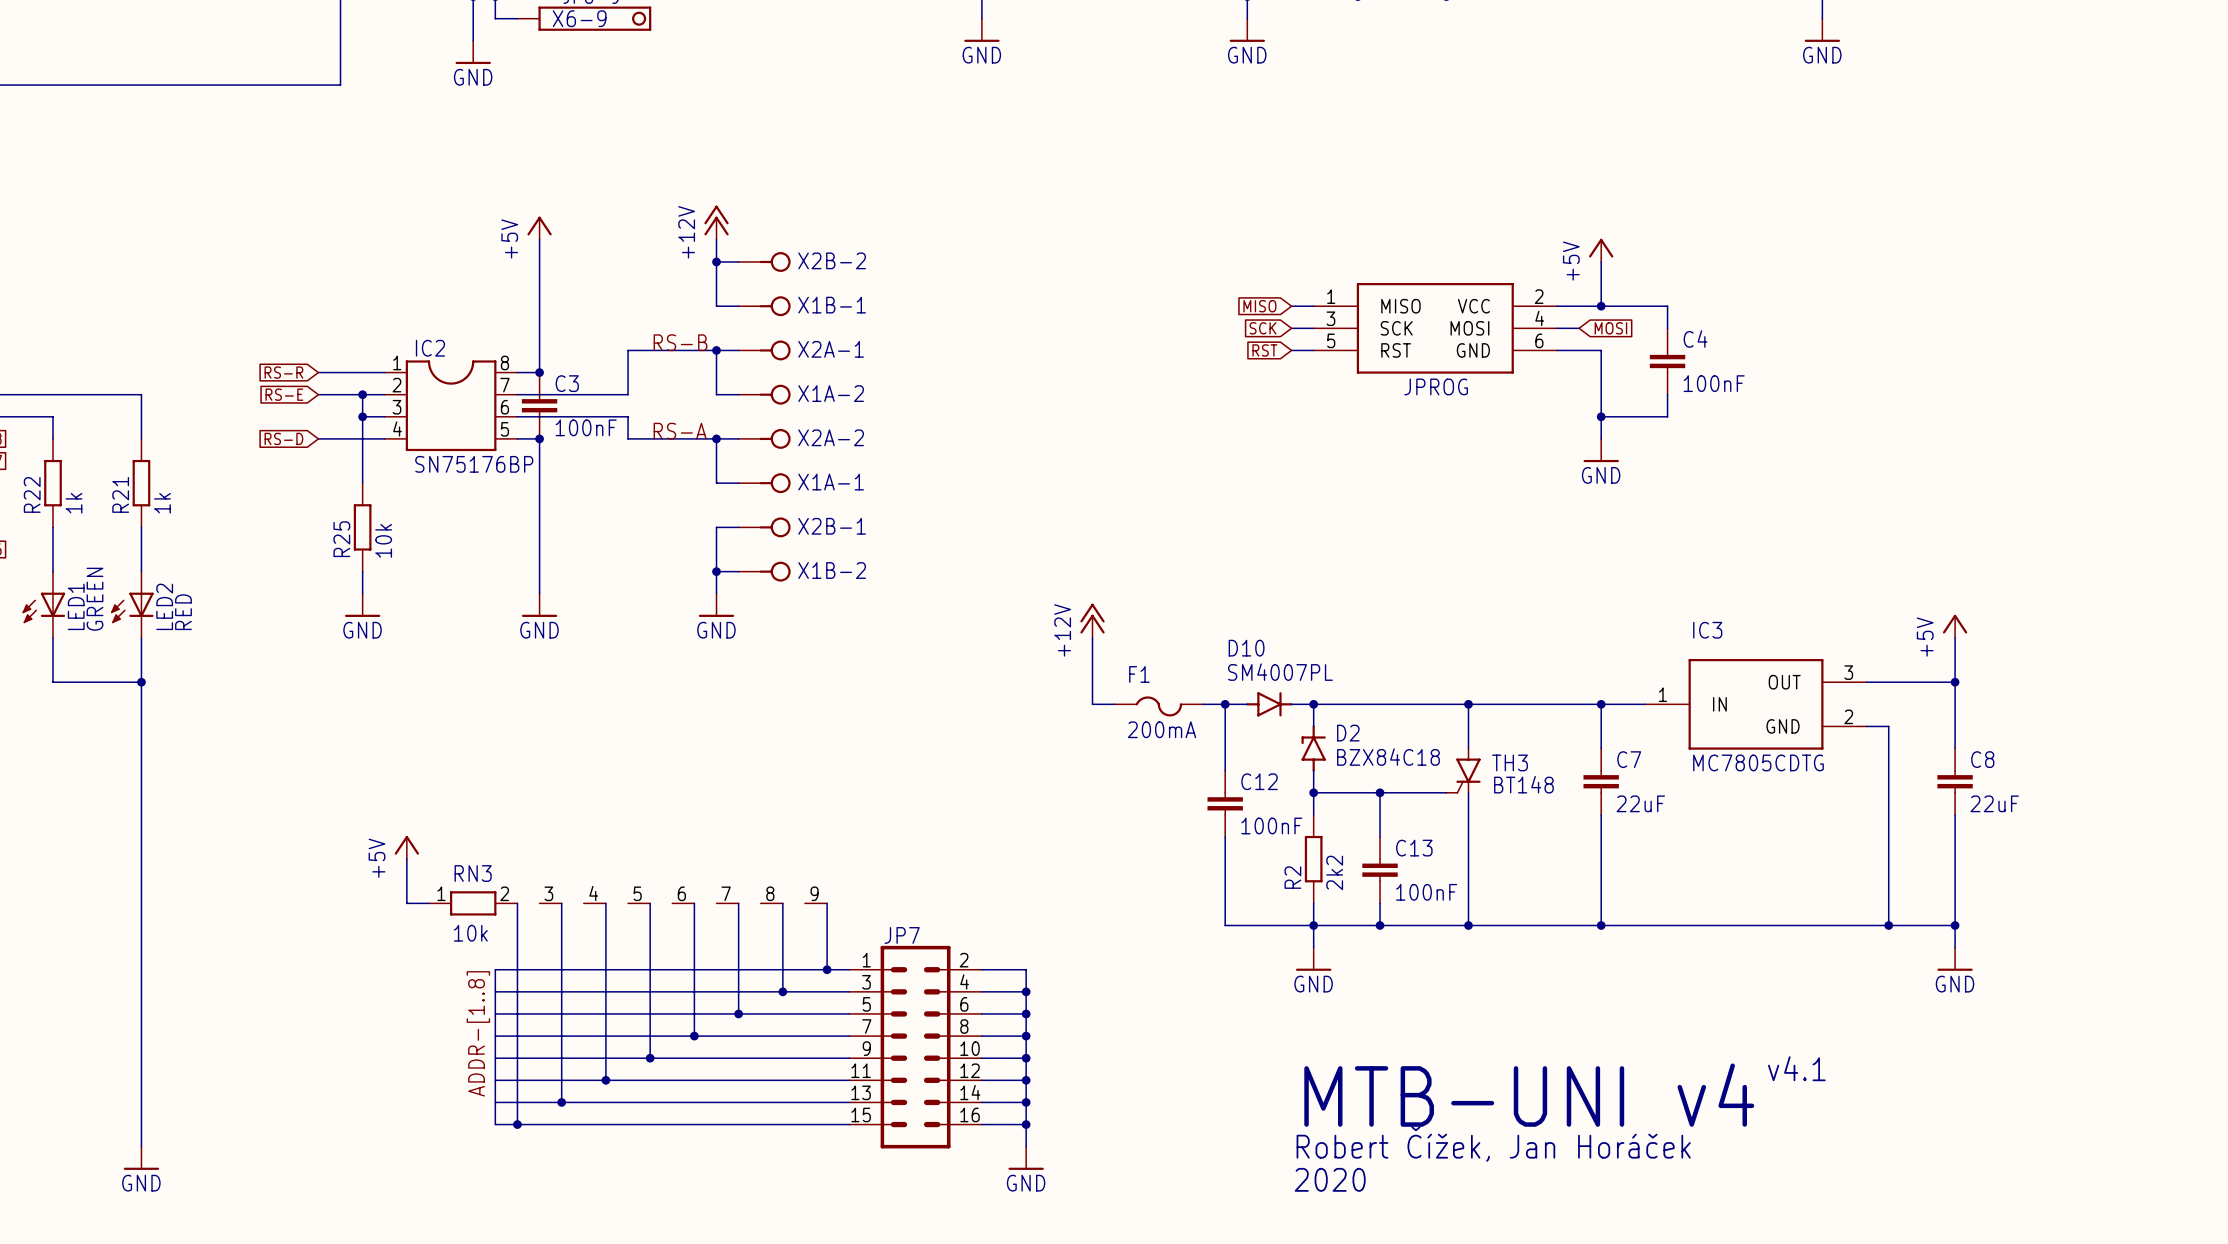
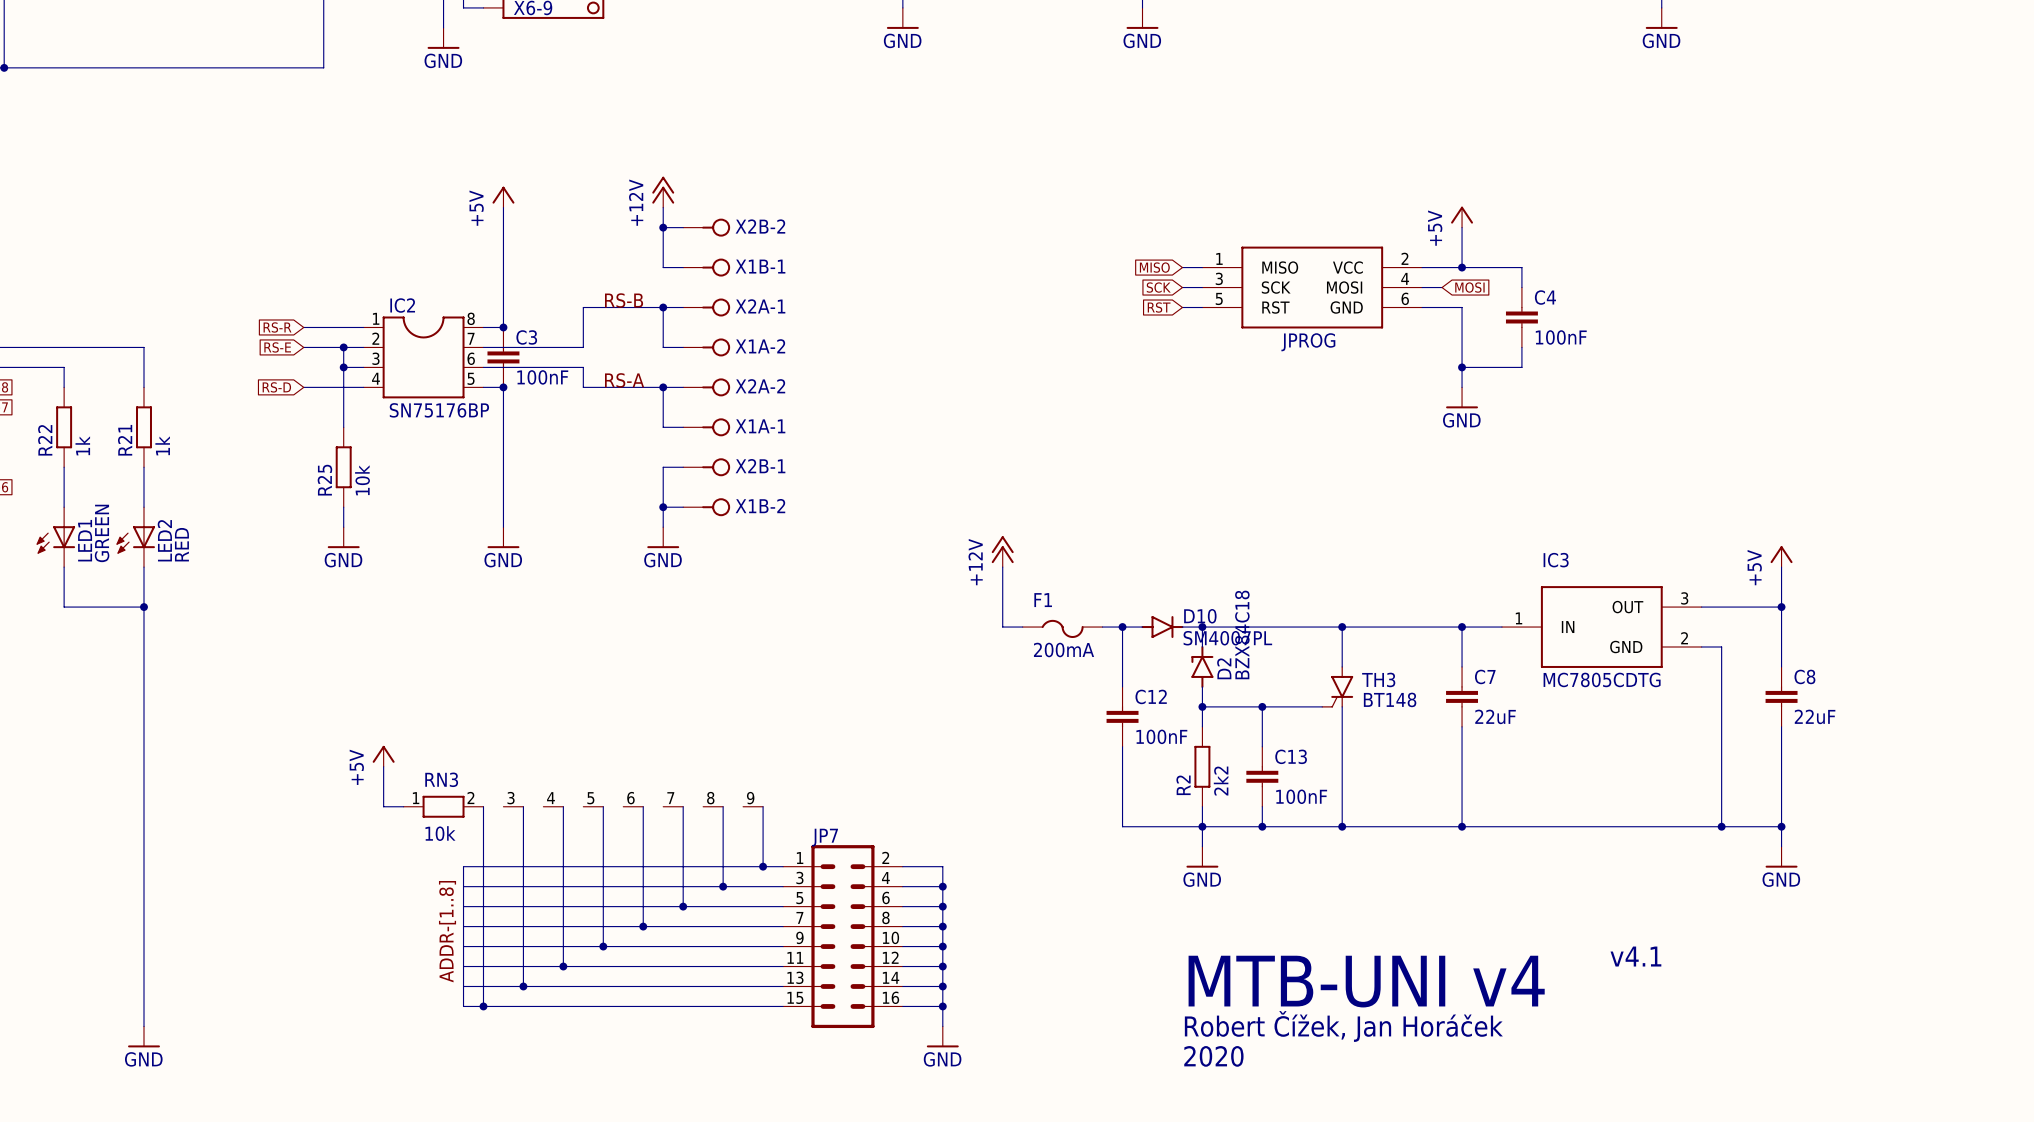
D10 name position: D10 (1246, 648) -> D10 (1200, 616)
D10 value position: SM4007PL (1280, 672) -> SM4007PL (1227, 638)
D2 name rotation: 0° (1348, 733) -> 90° counterclockwise (1224, 668)
D2 value rotation: 0° (1388, 757) -> 90° counterclockwise (1242, 634)

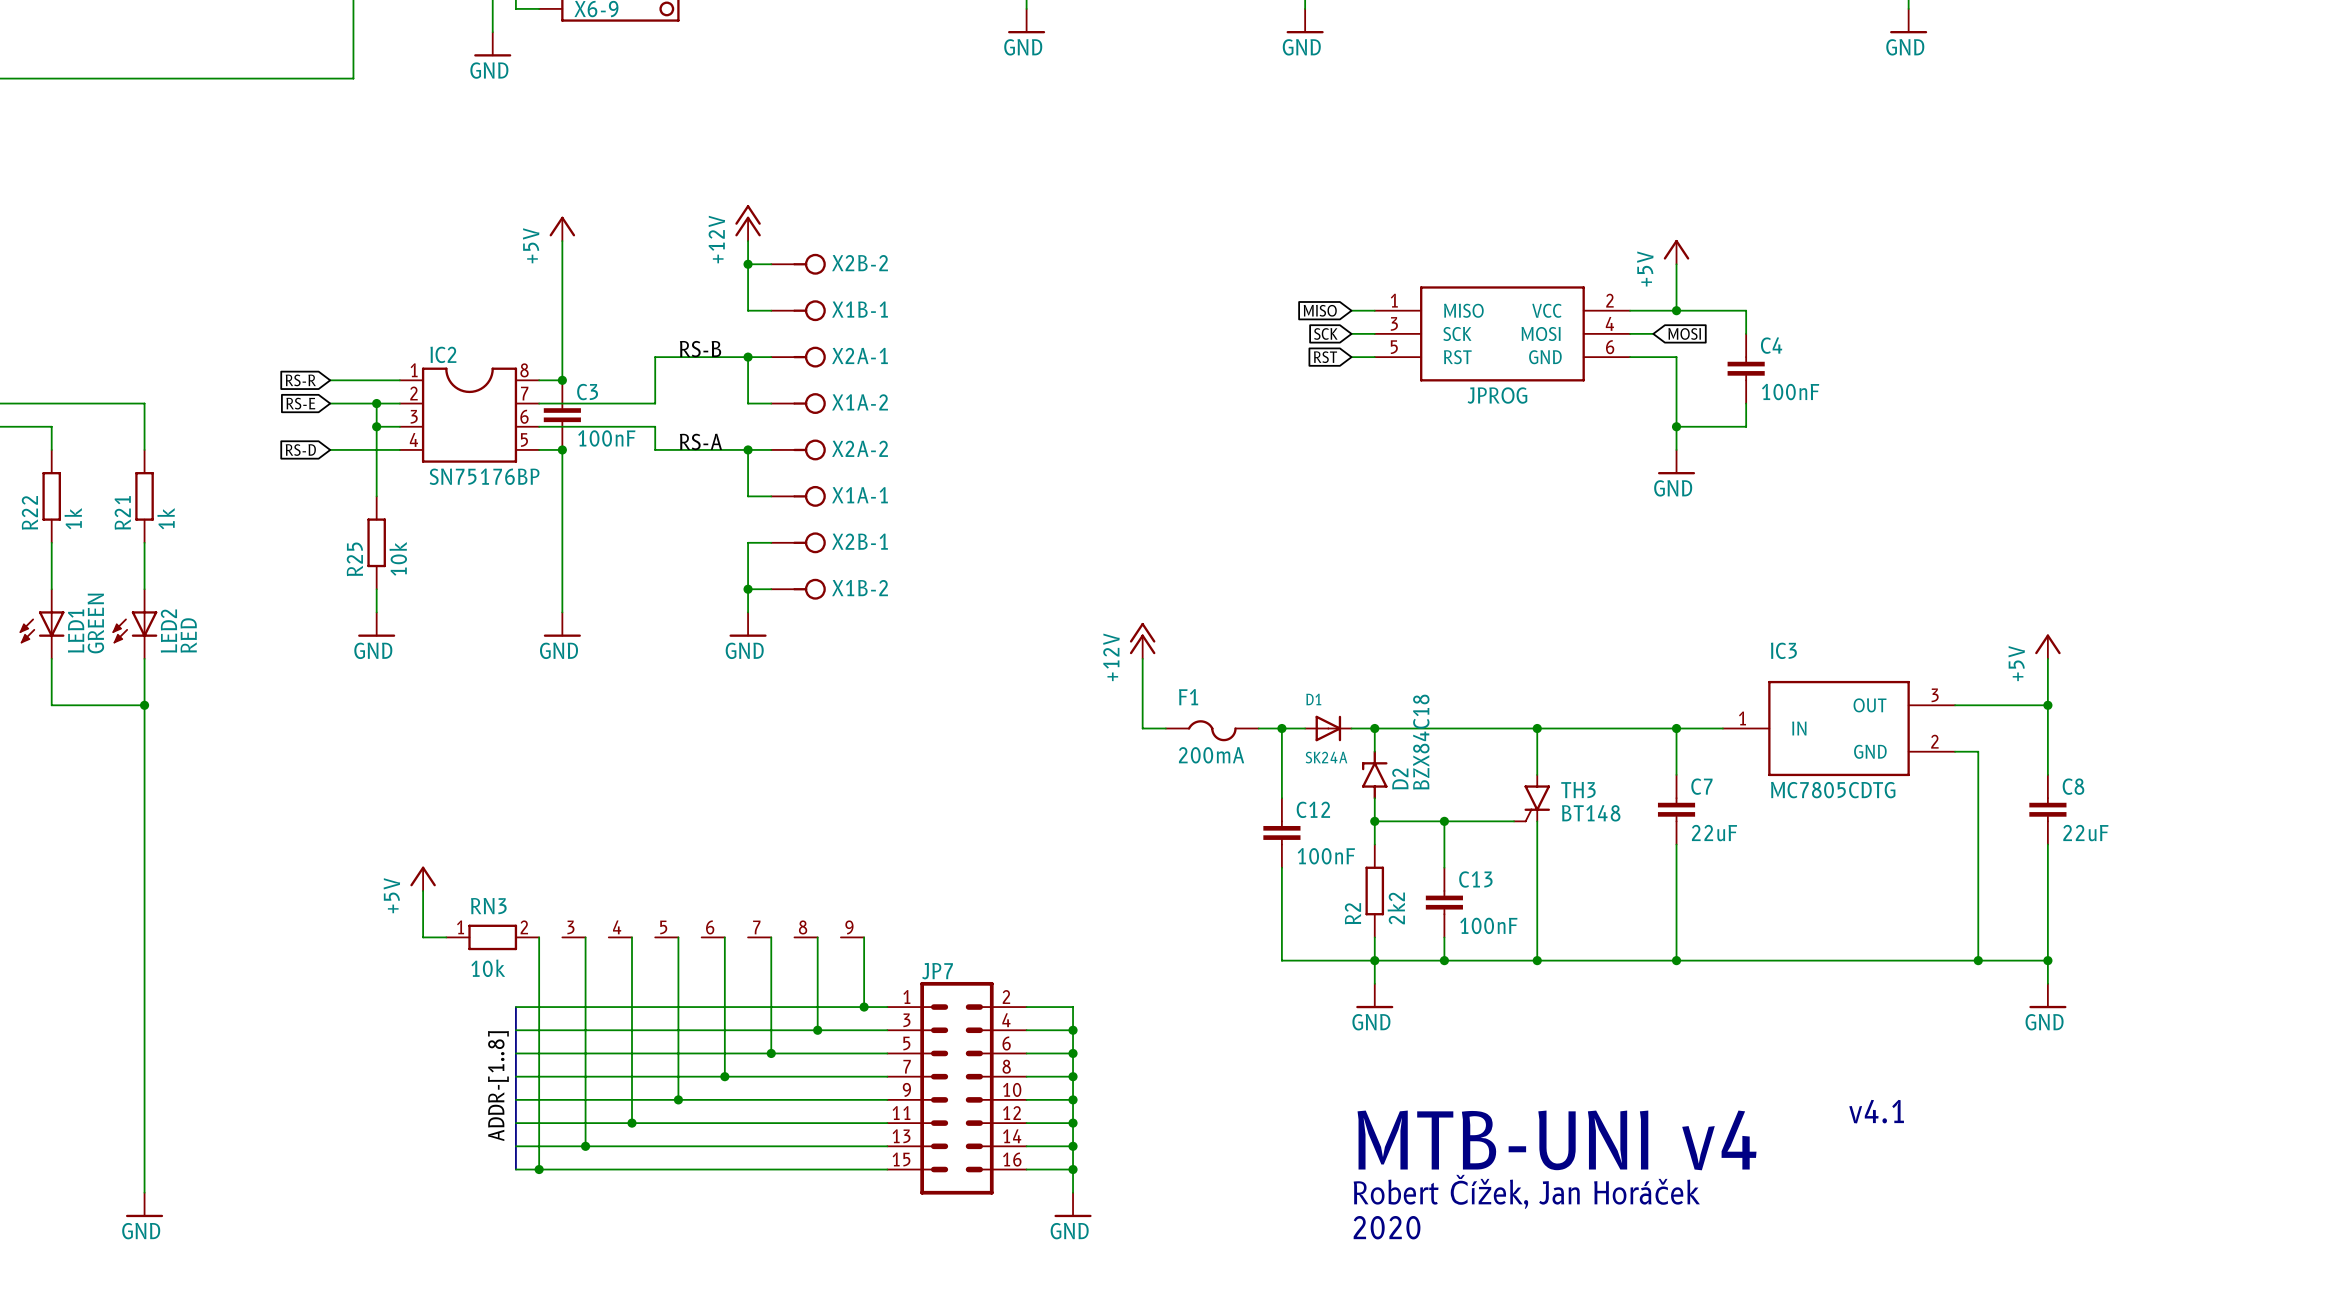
D10: SM4007PL (1162, 627) -> none
D1: none -> SK24A (1328, 728)

